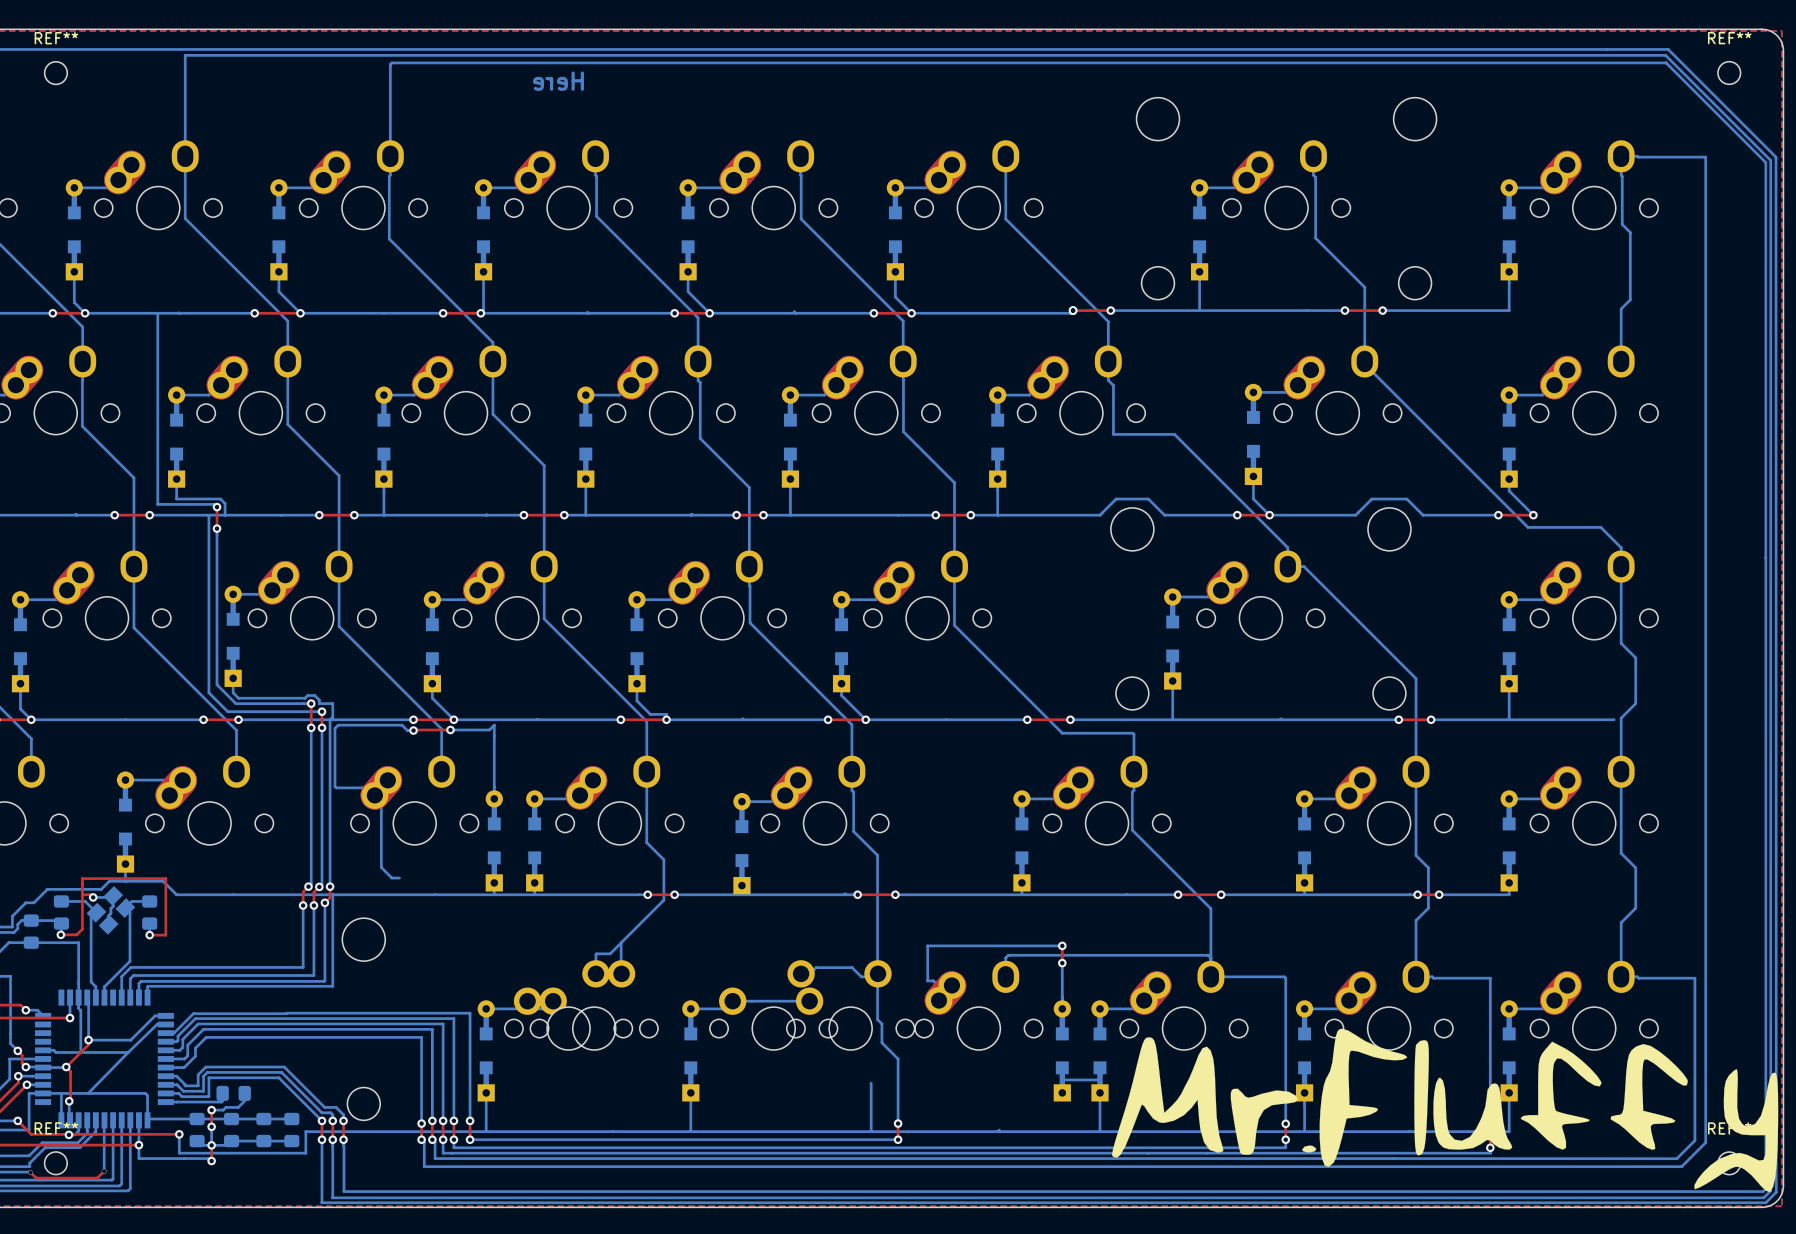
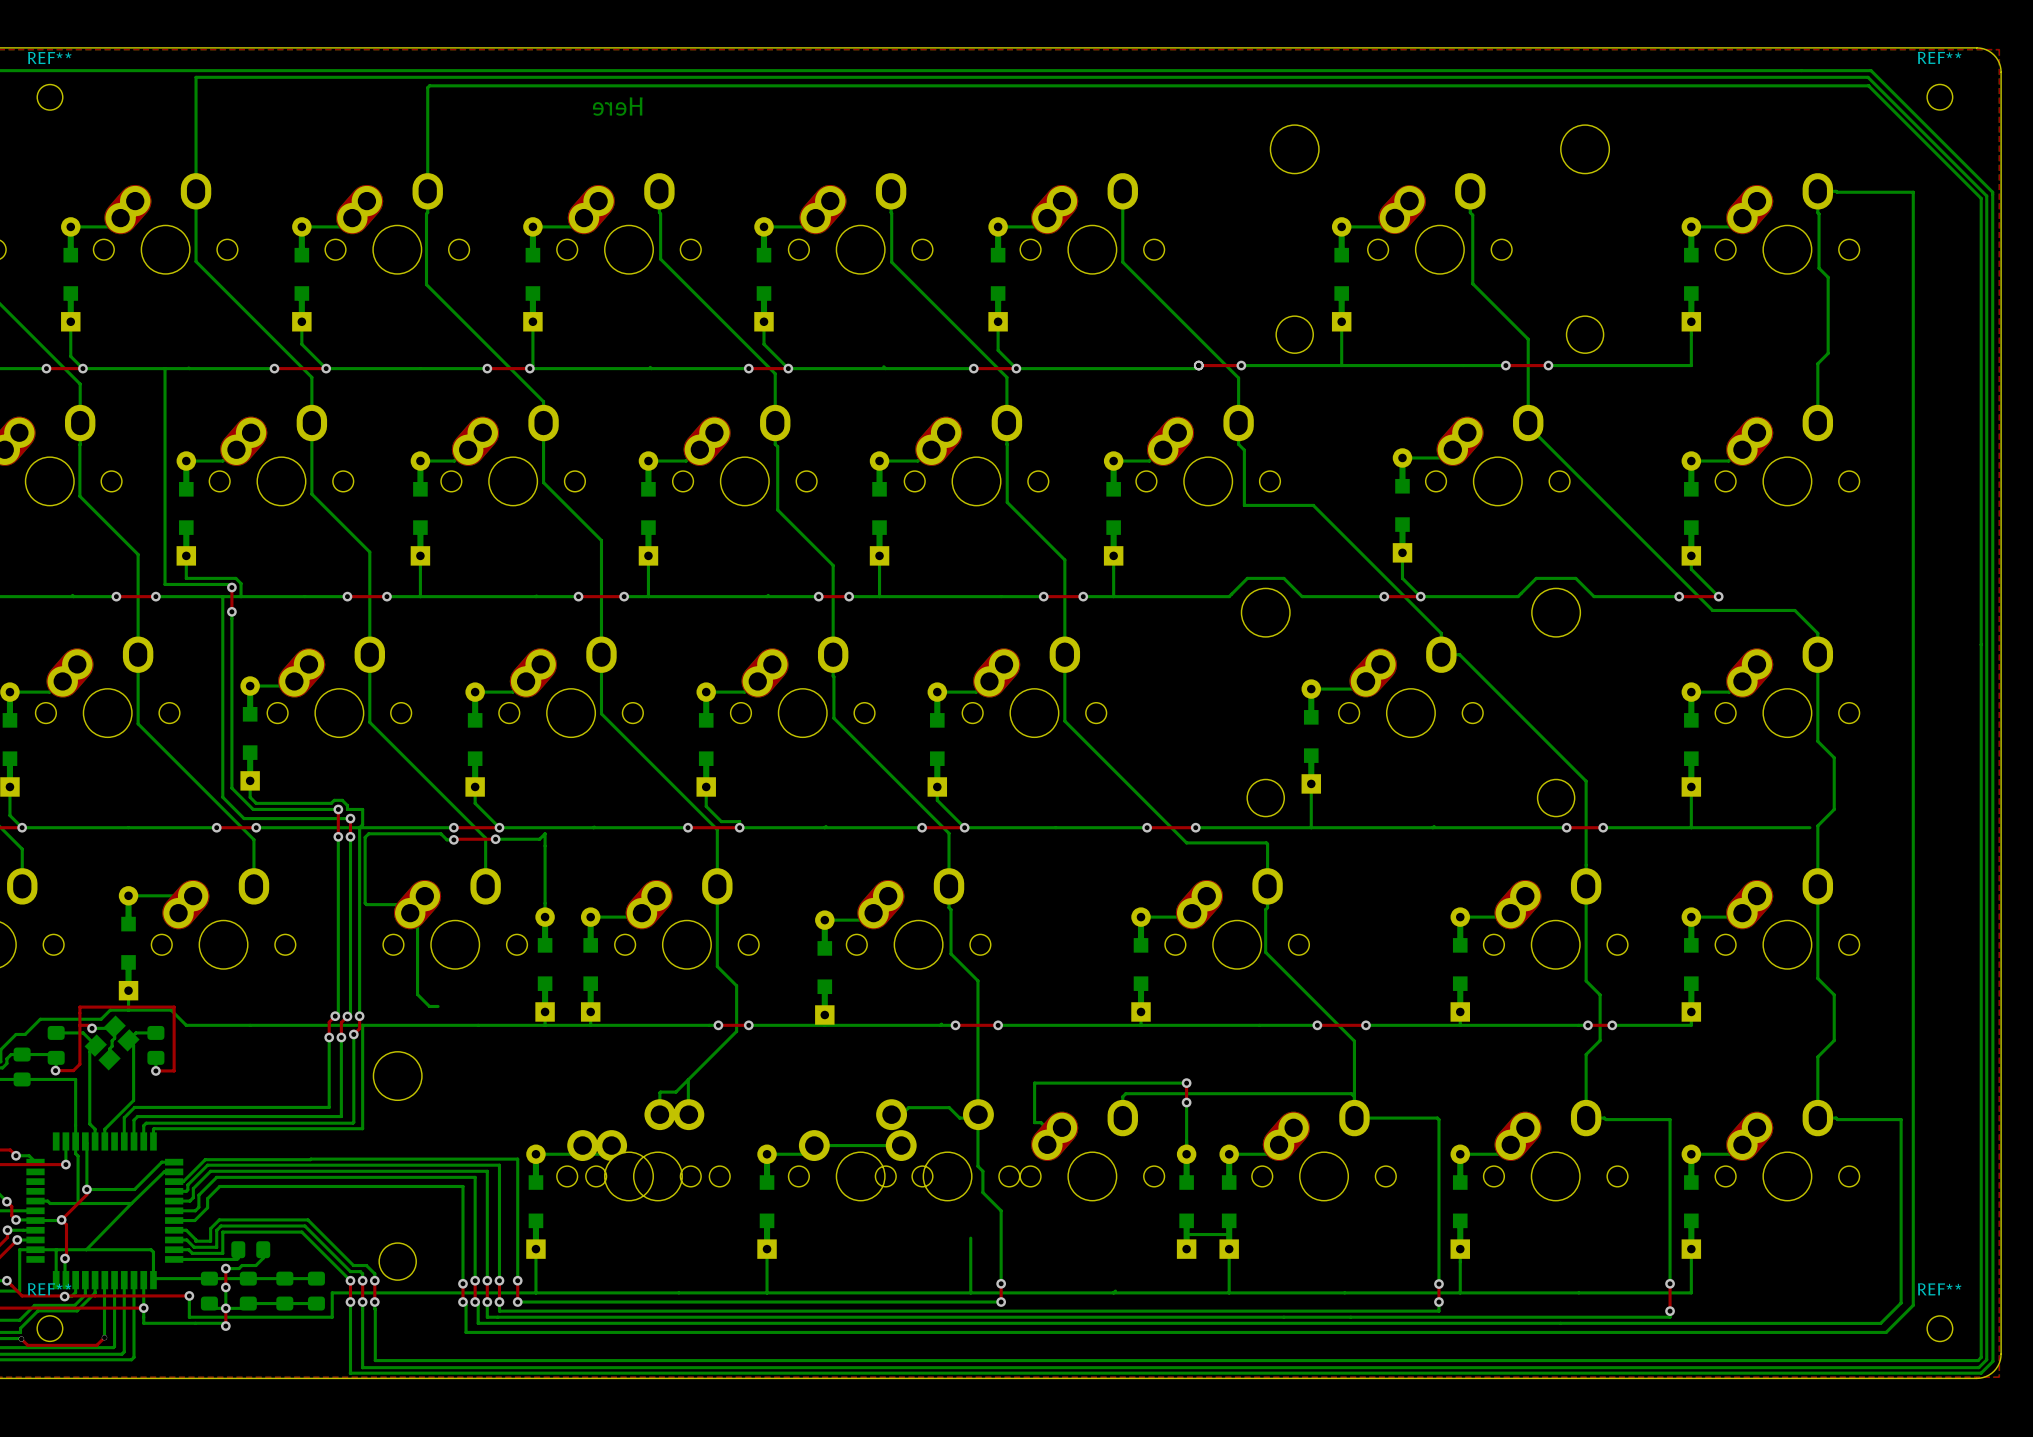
drawing: [1111, 1028, 1779, 1193] -> none

